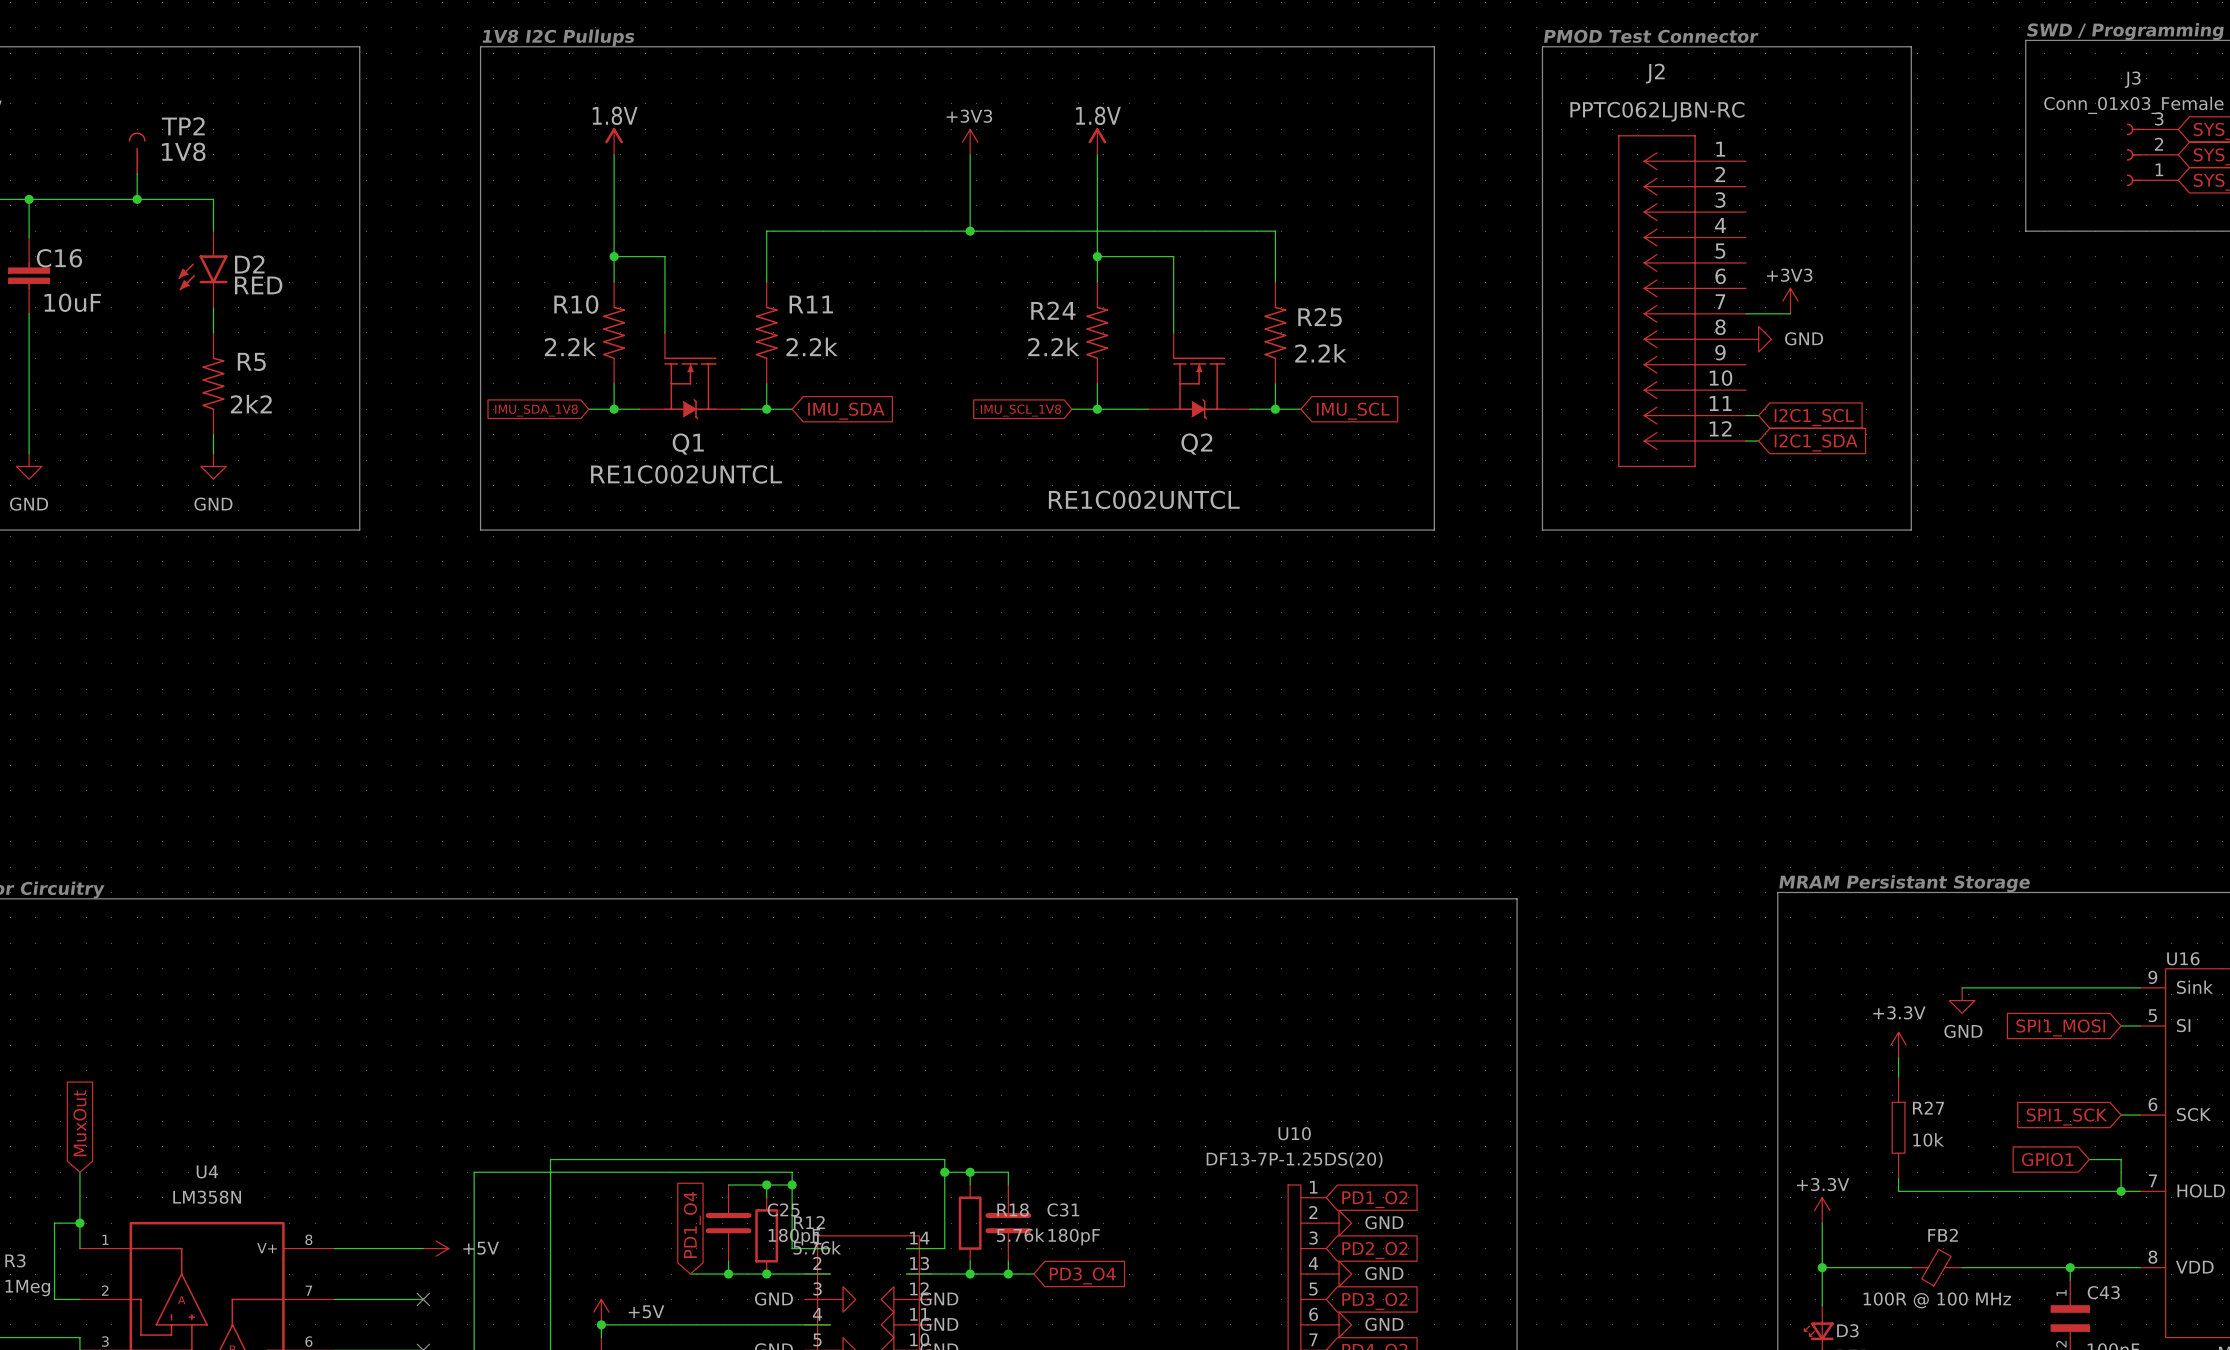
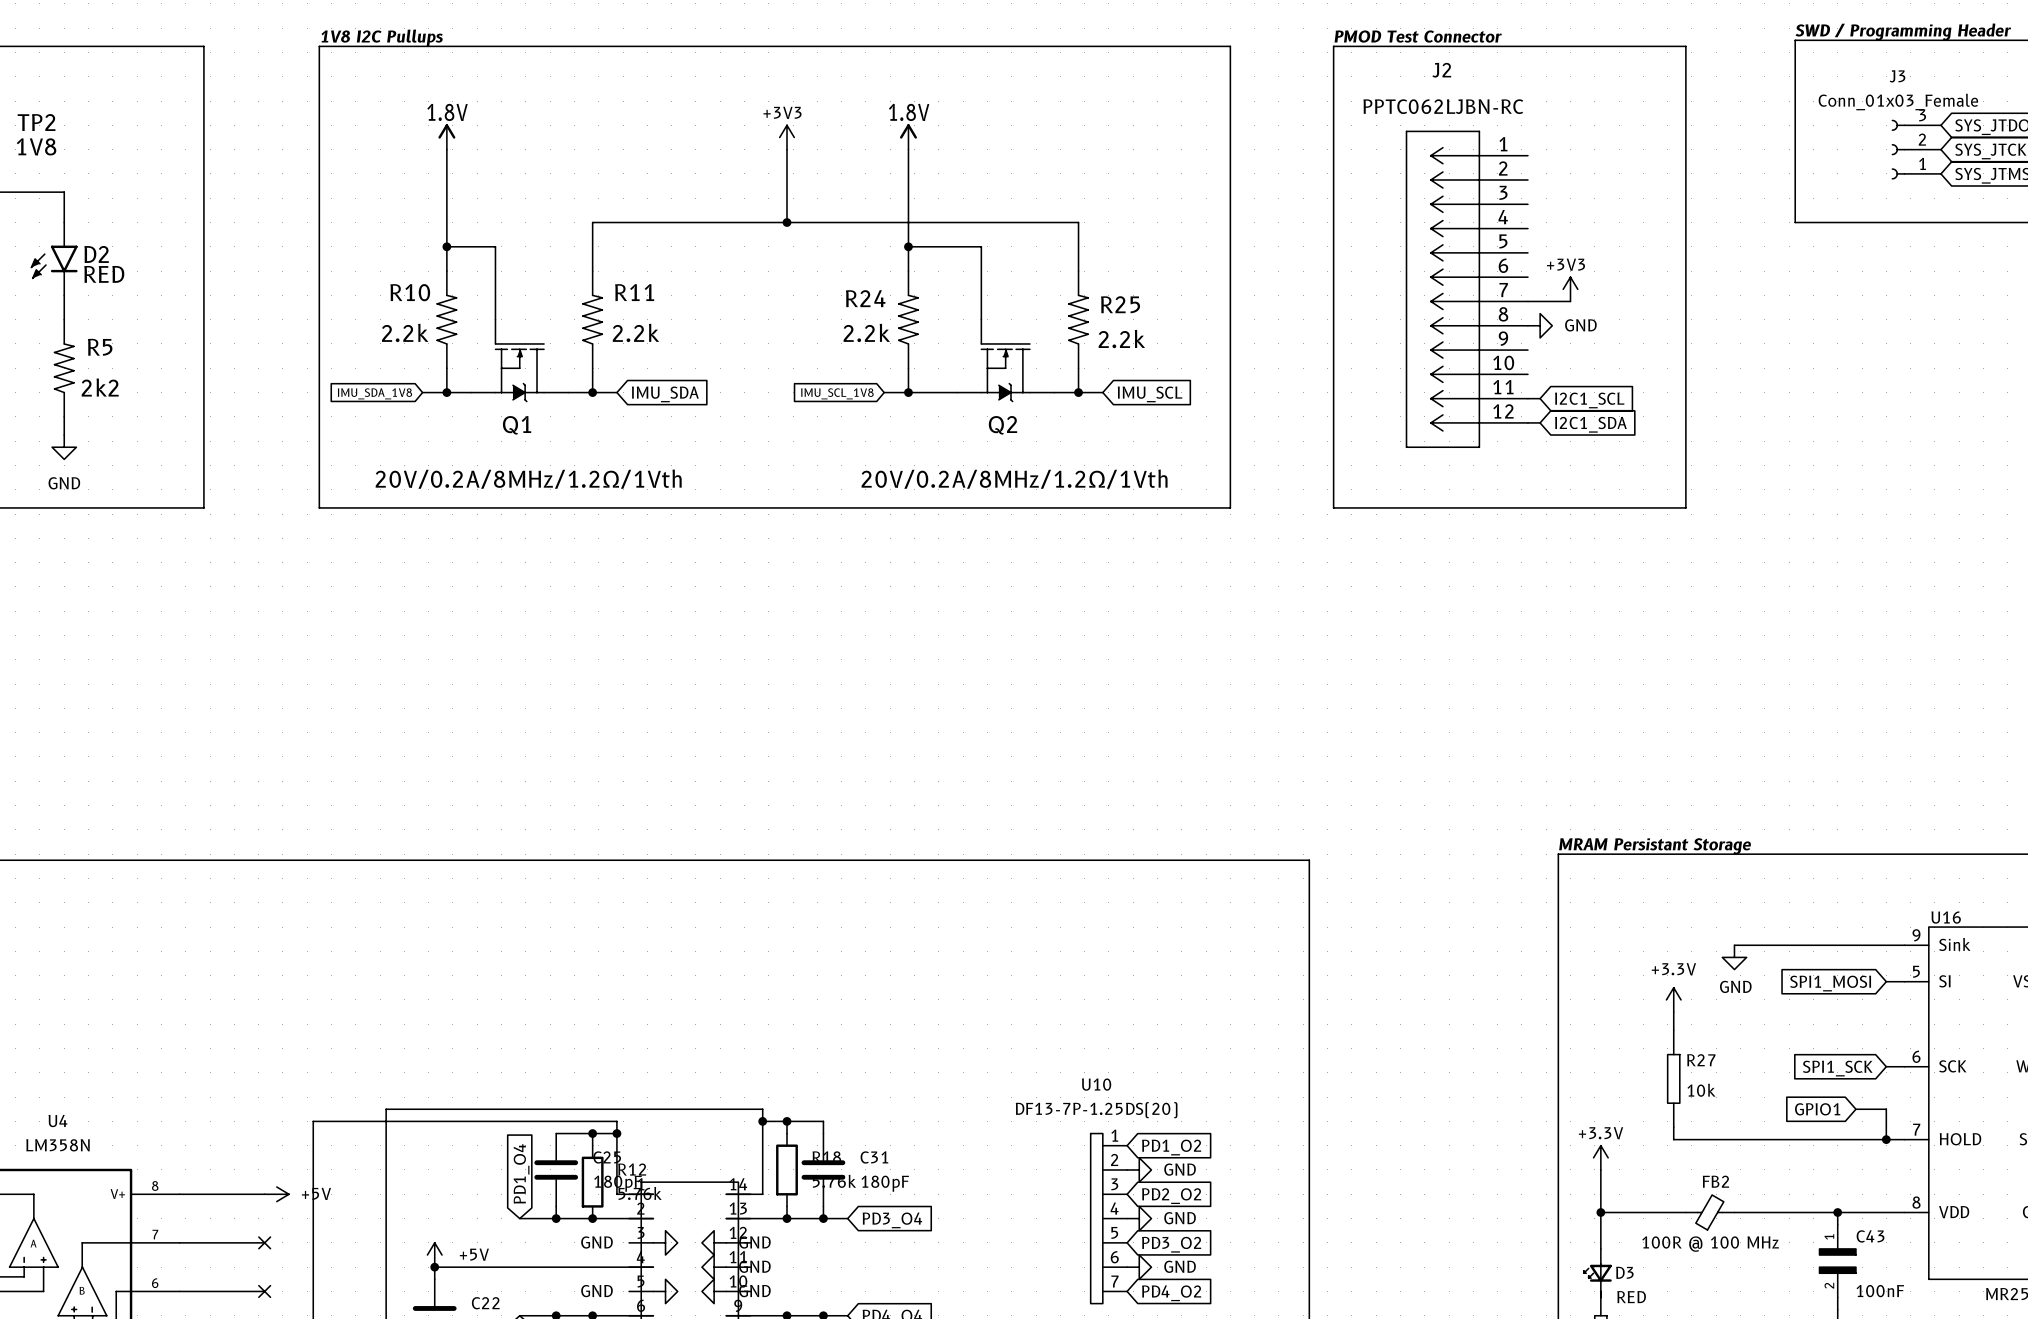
Q1 value: RE1C002UNTCL (686, 474) -> 20V/0.2A/8MHz/1.2Ω/1Vth (528, 479)
Q2 value: RE1C002UNTCL (1144, 499) -> 20V/0.2A/8MHz/1.2Ω/1Vth (1014, 479)

